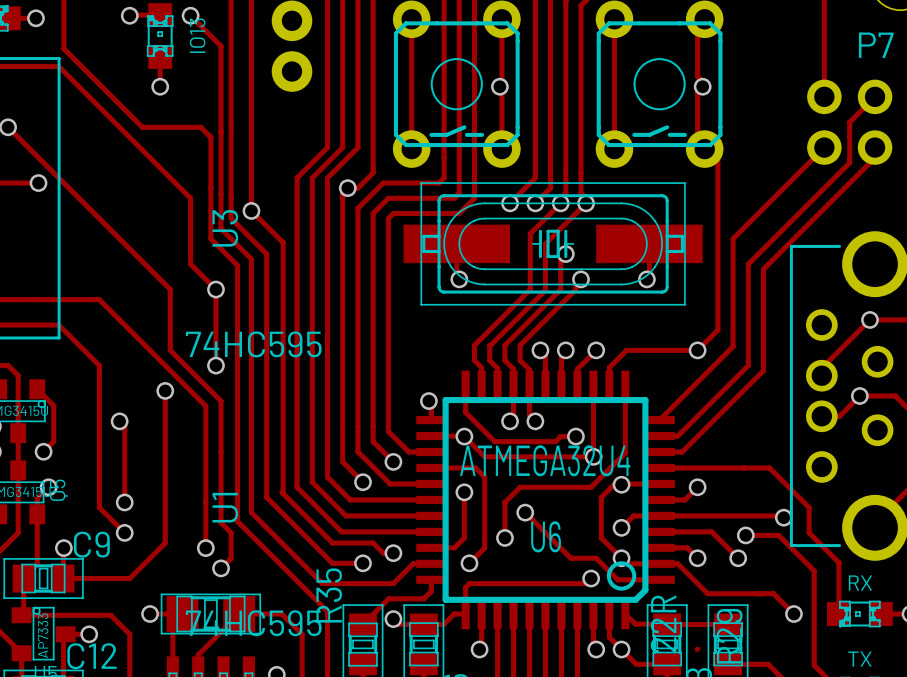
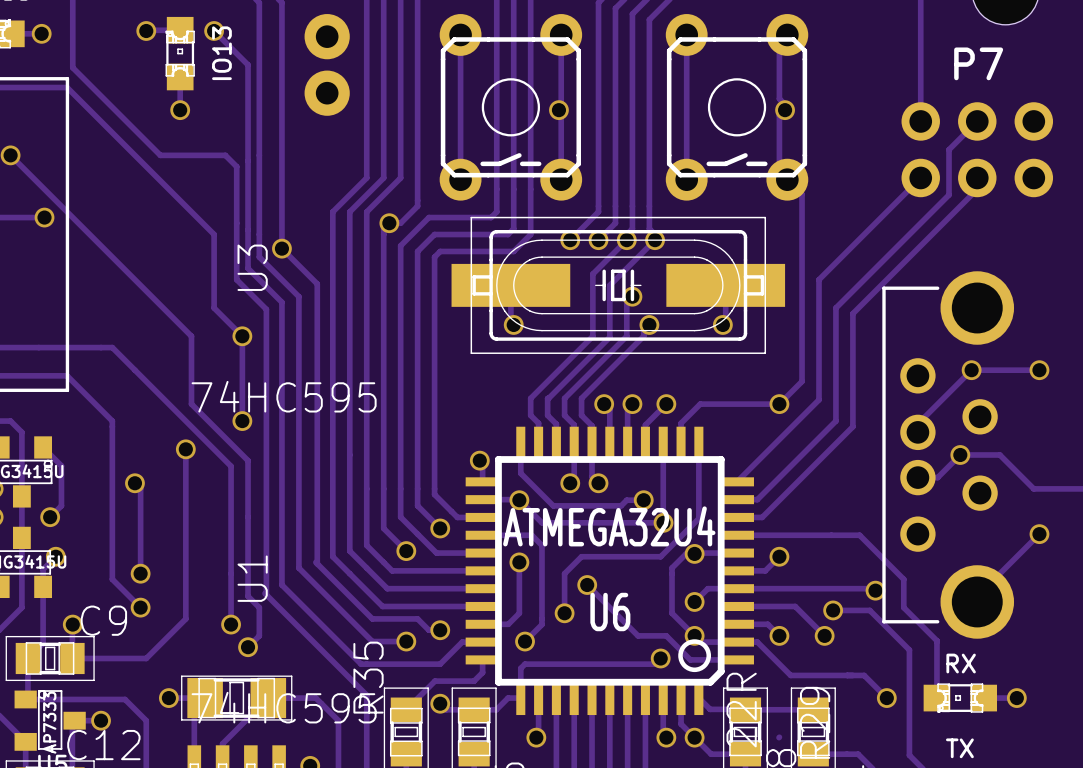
Q5 name: Q5 (58, 490) -> none

